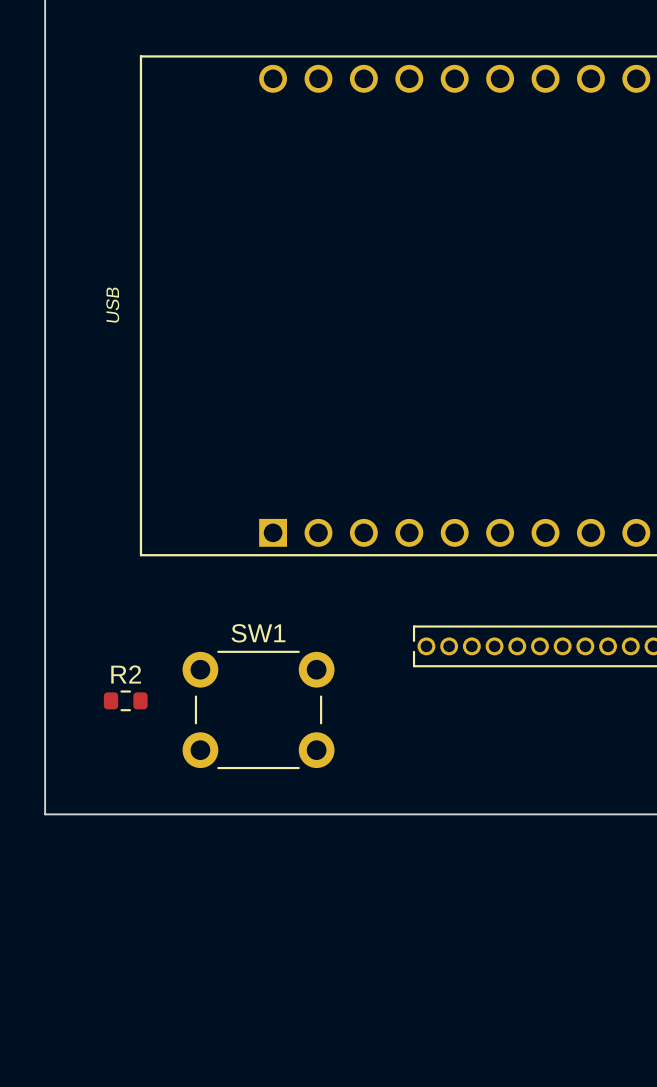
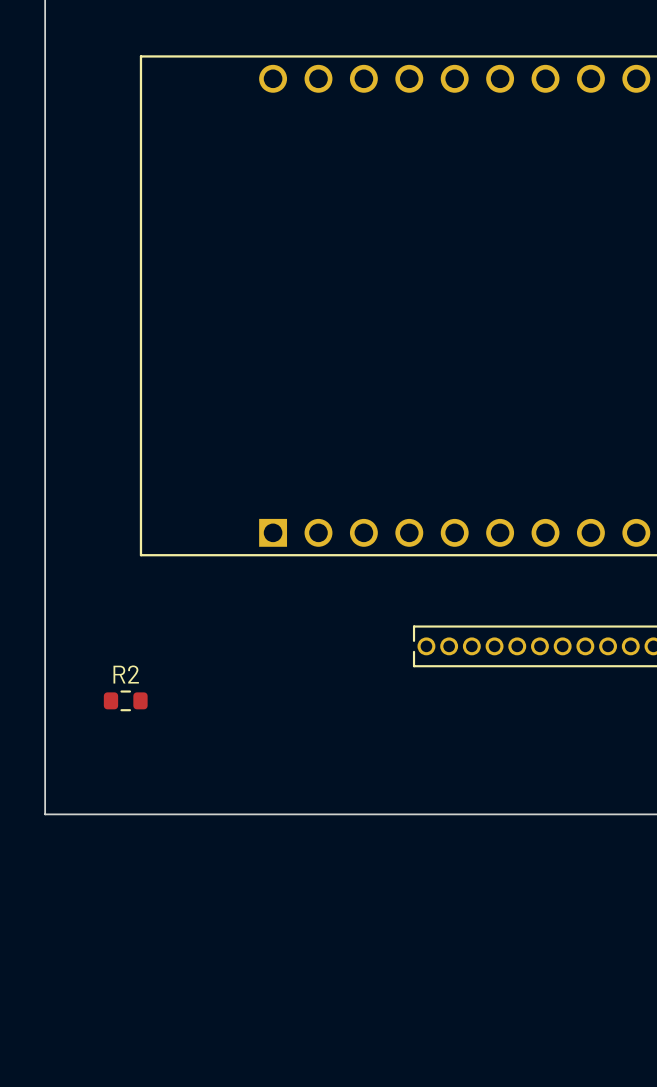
text: USB (112, 304) -> none
SW1: (258, 709) -> none

